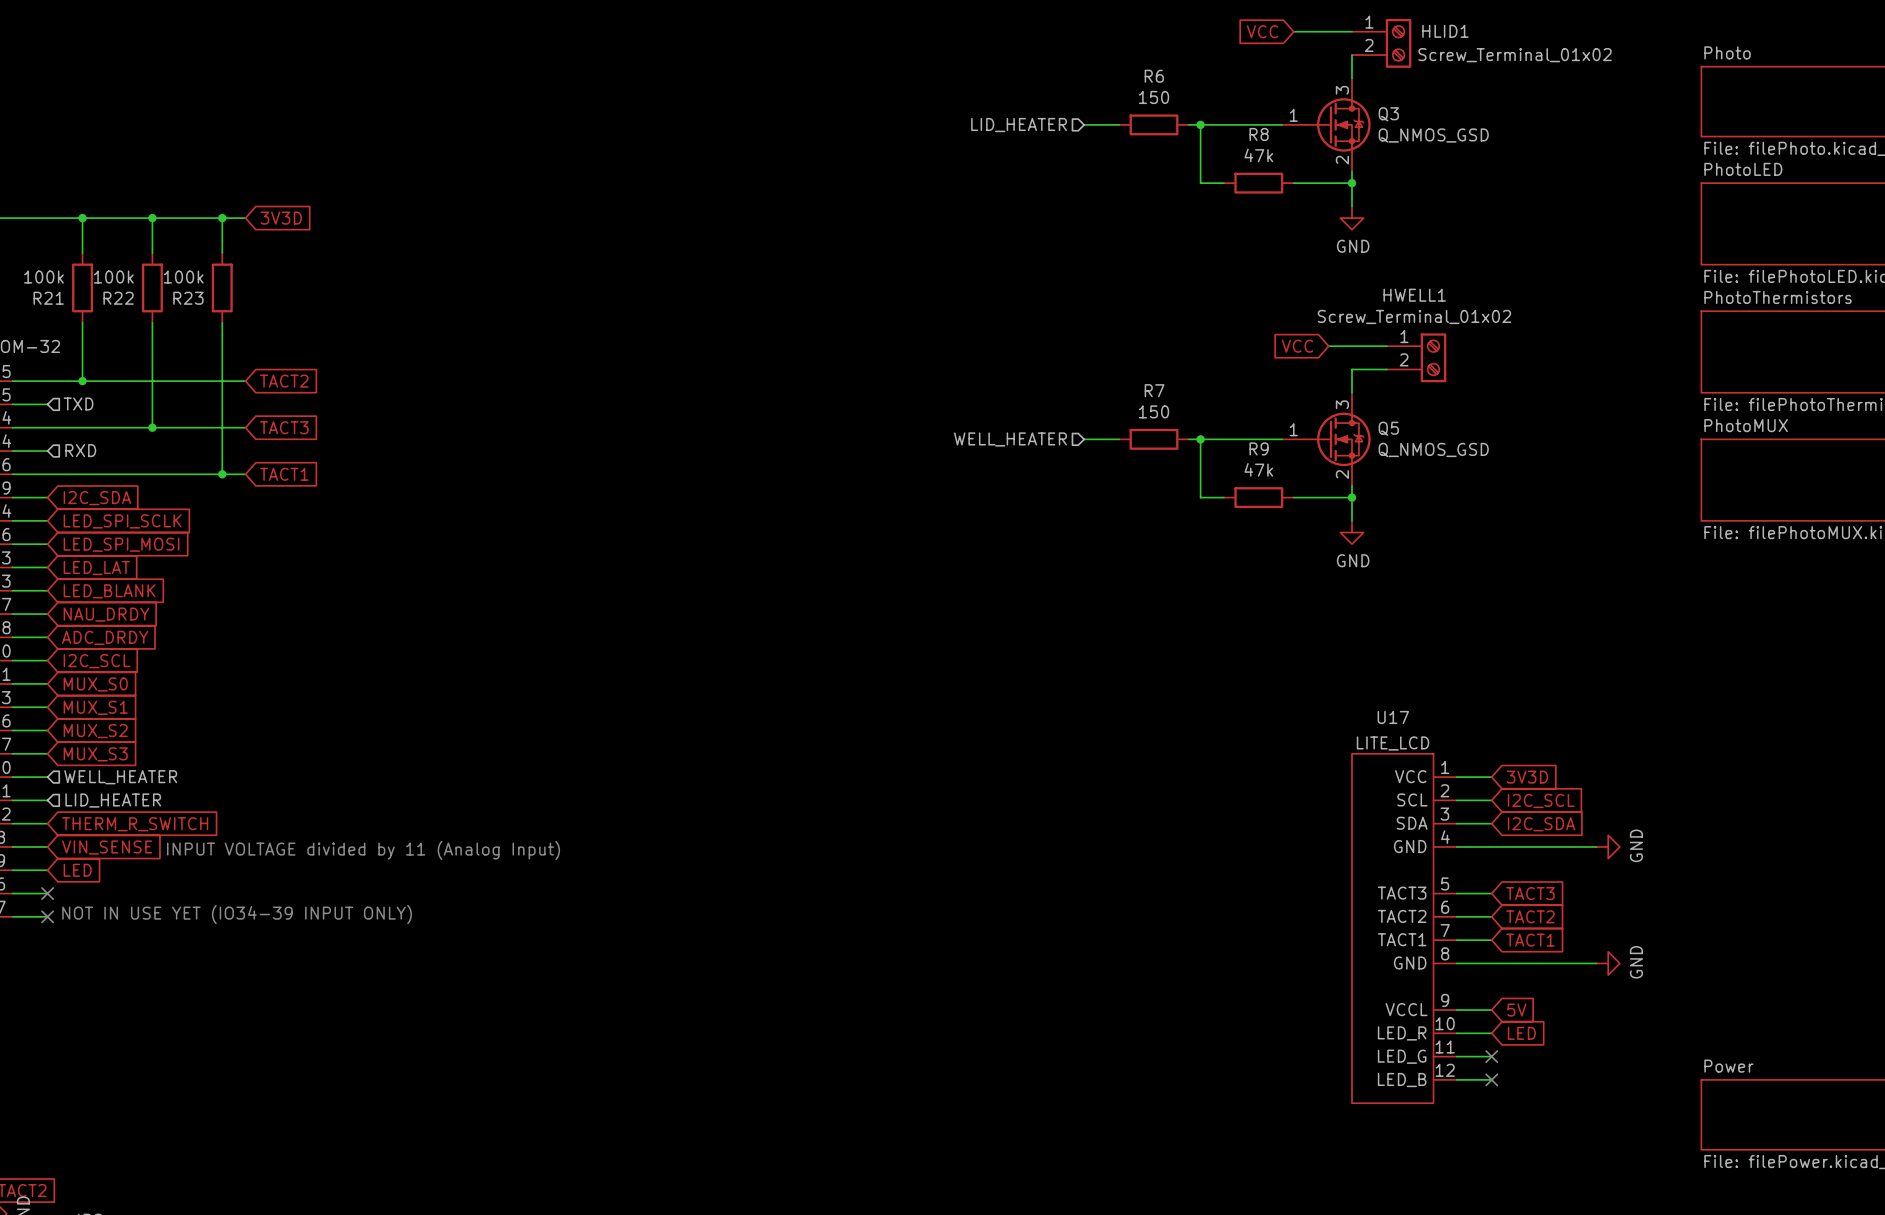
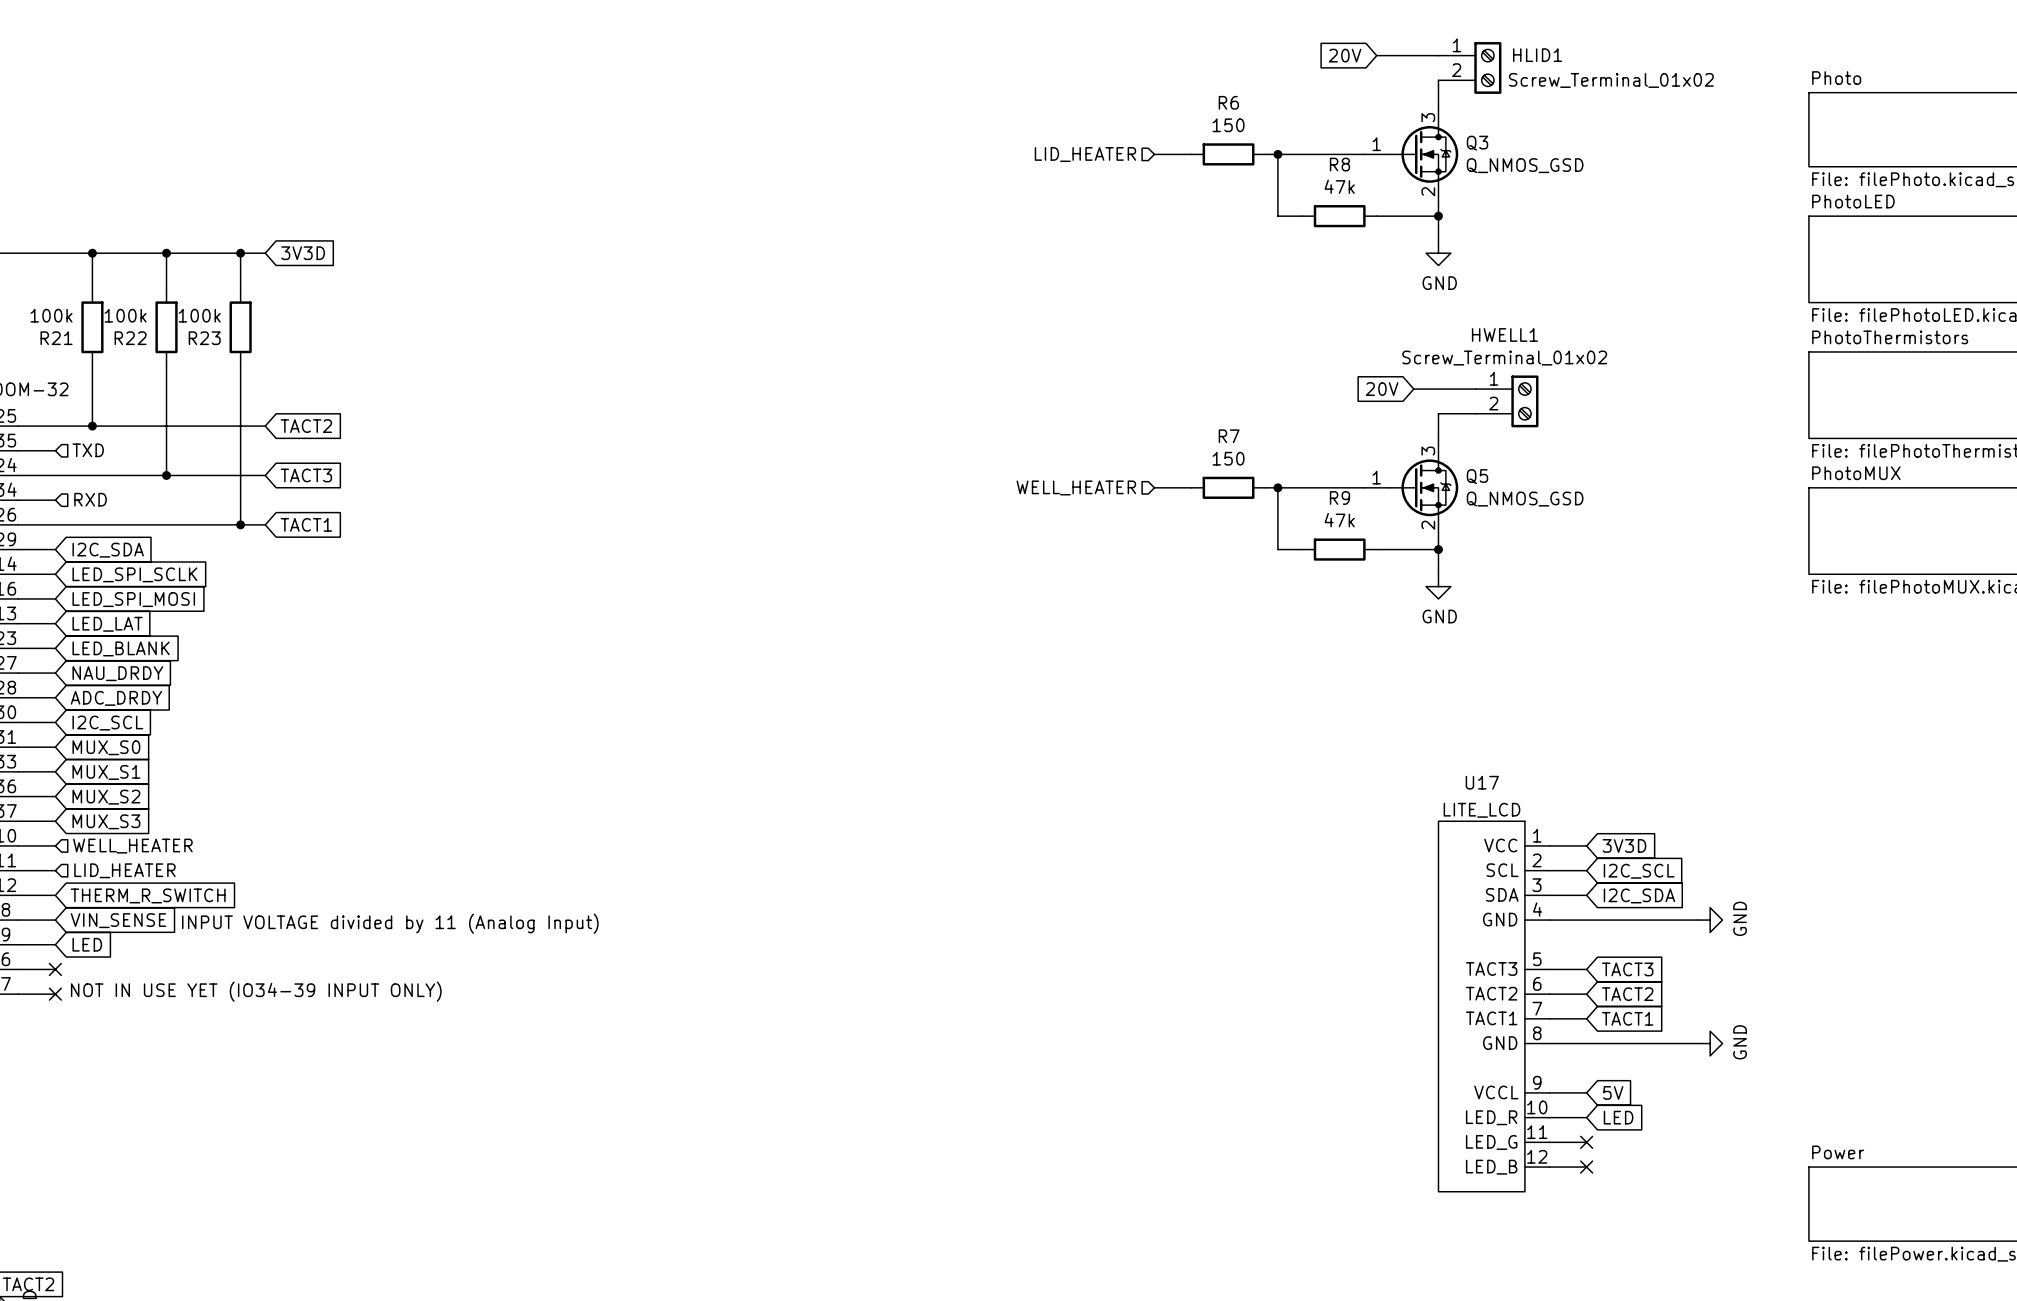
global label: VCC (1262, 31) -> 20V (1345, 55)
global label: VCC (1297, 346) -> 20V (1382, 389)

